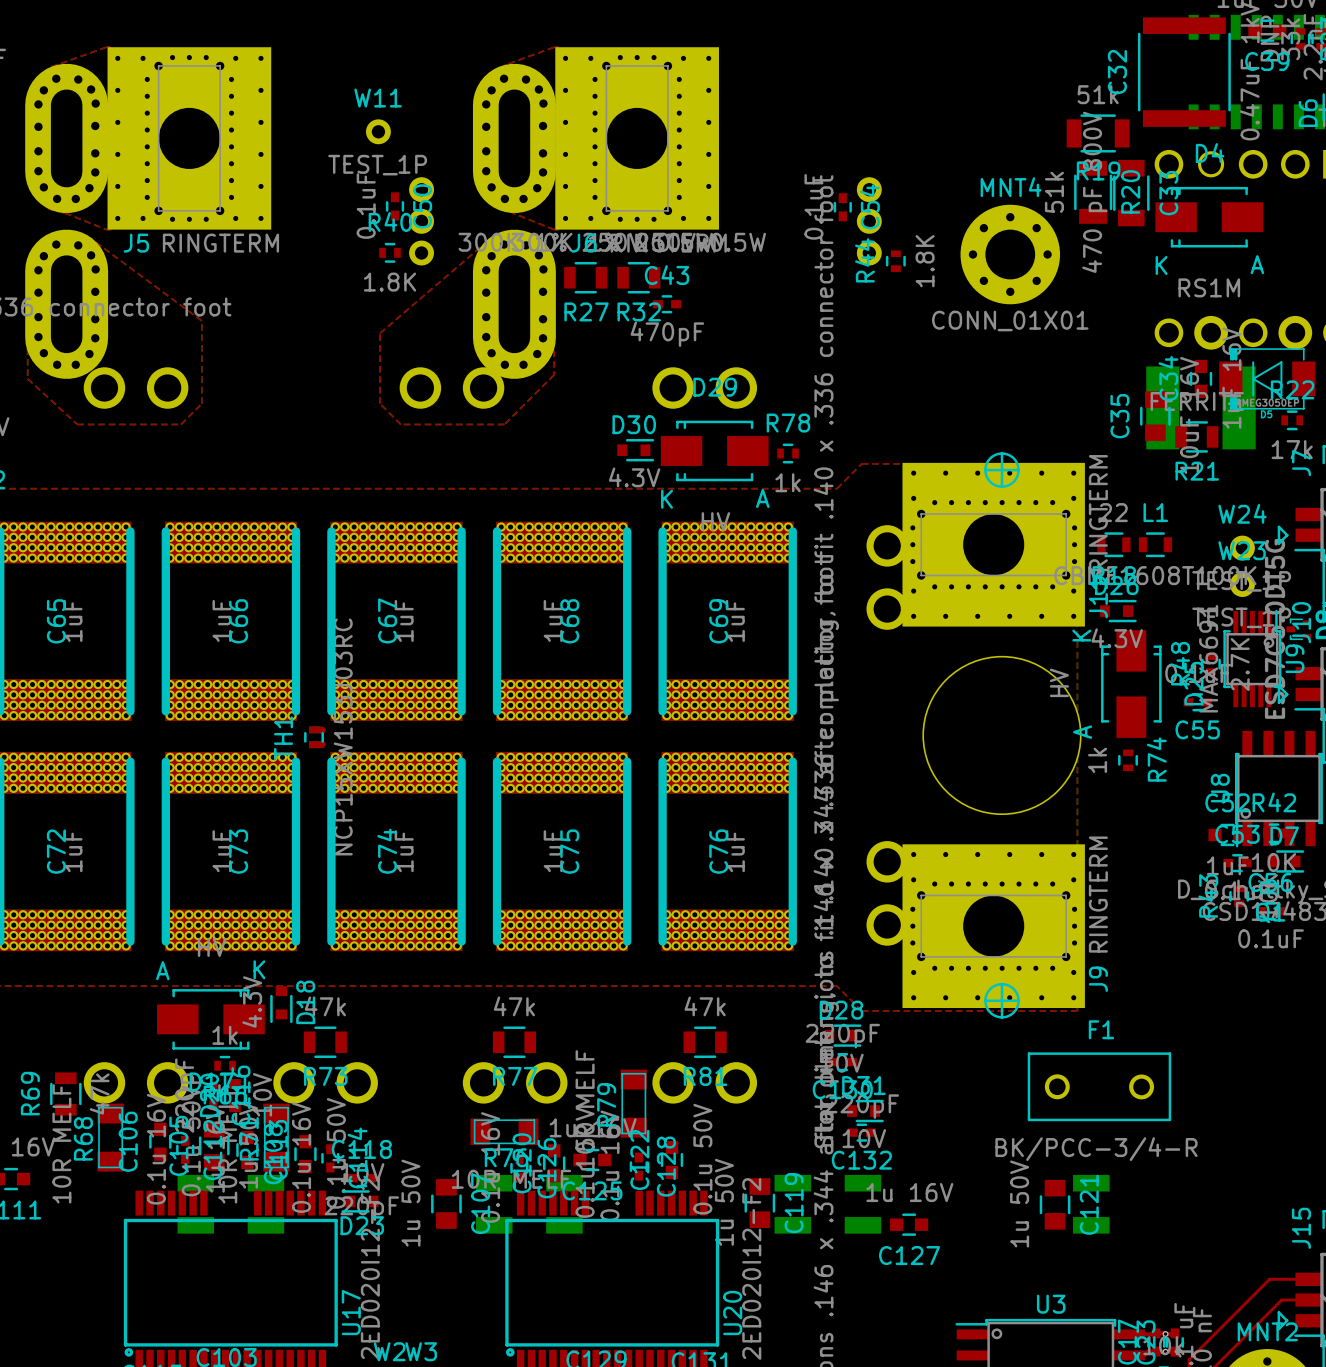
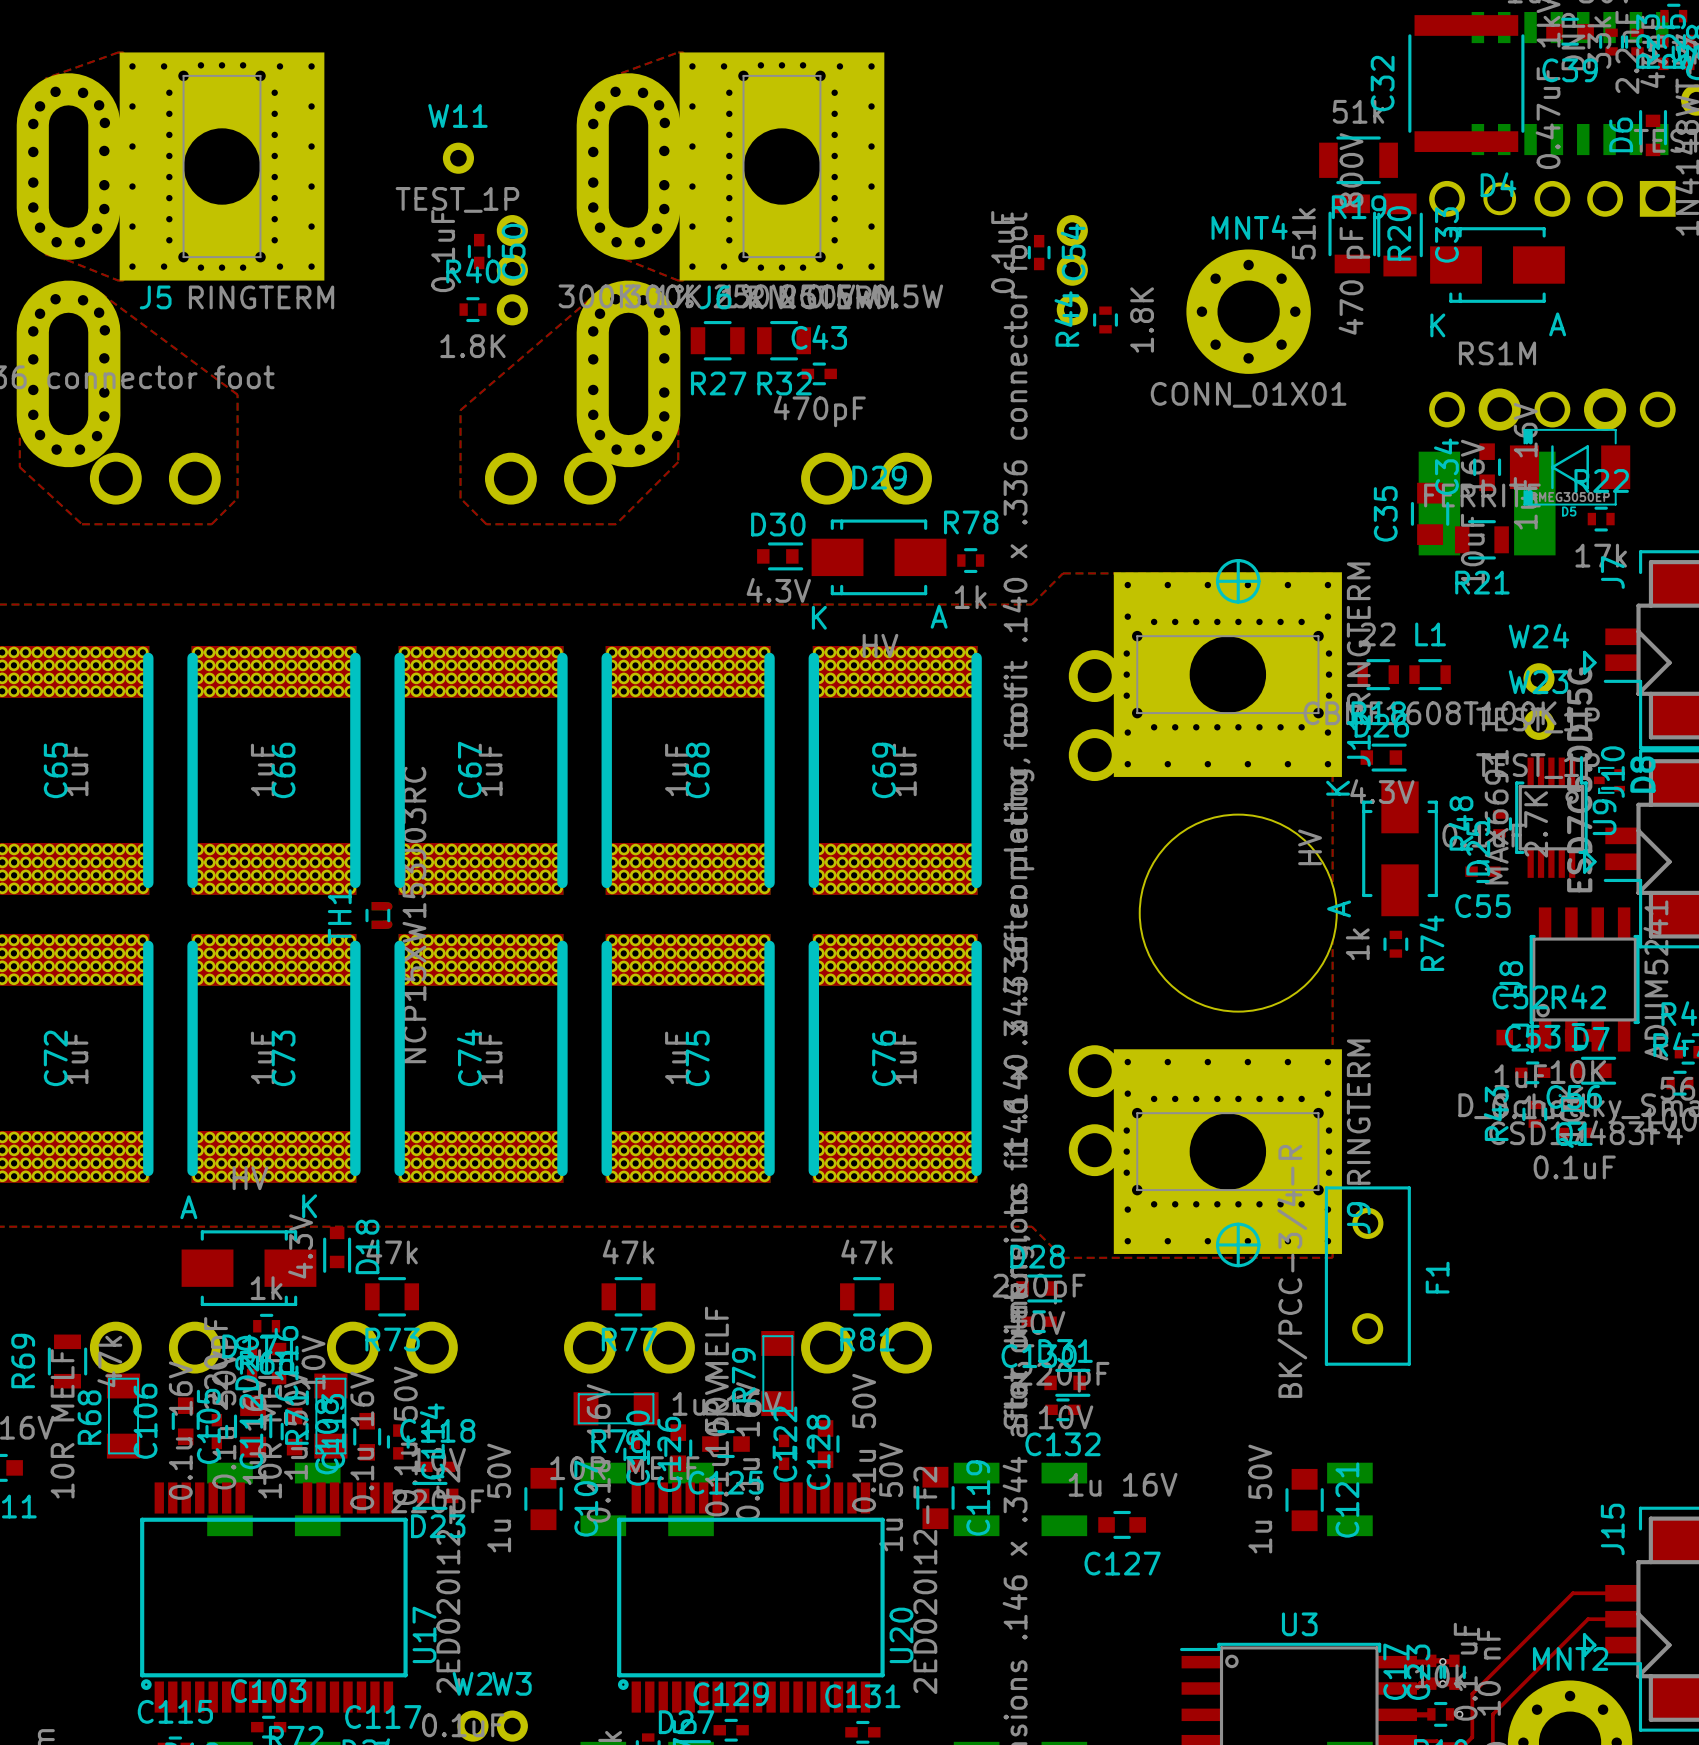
F1 rotation: 0° (1099, 1086) -> 90° clockwise (1367, 1276)

